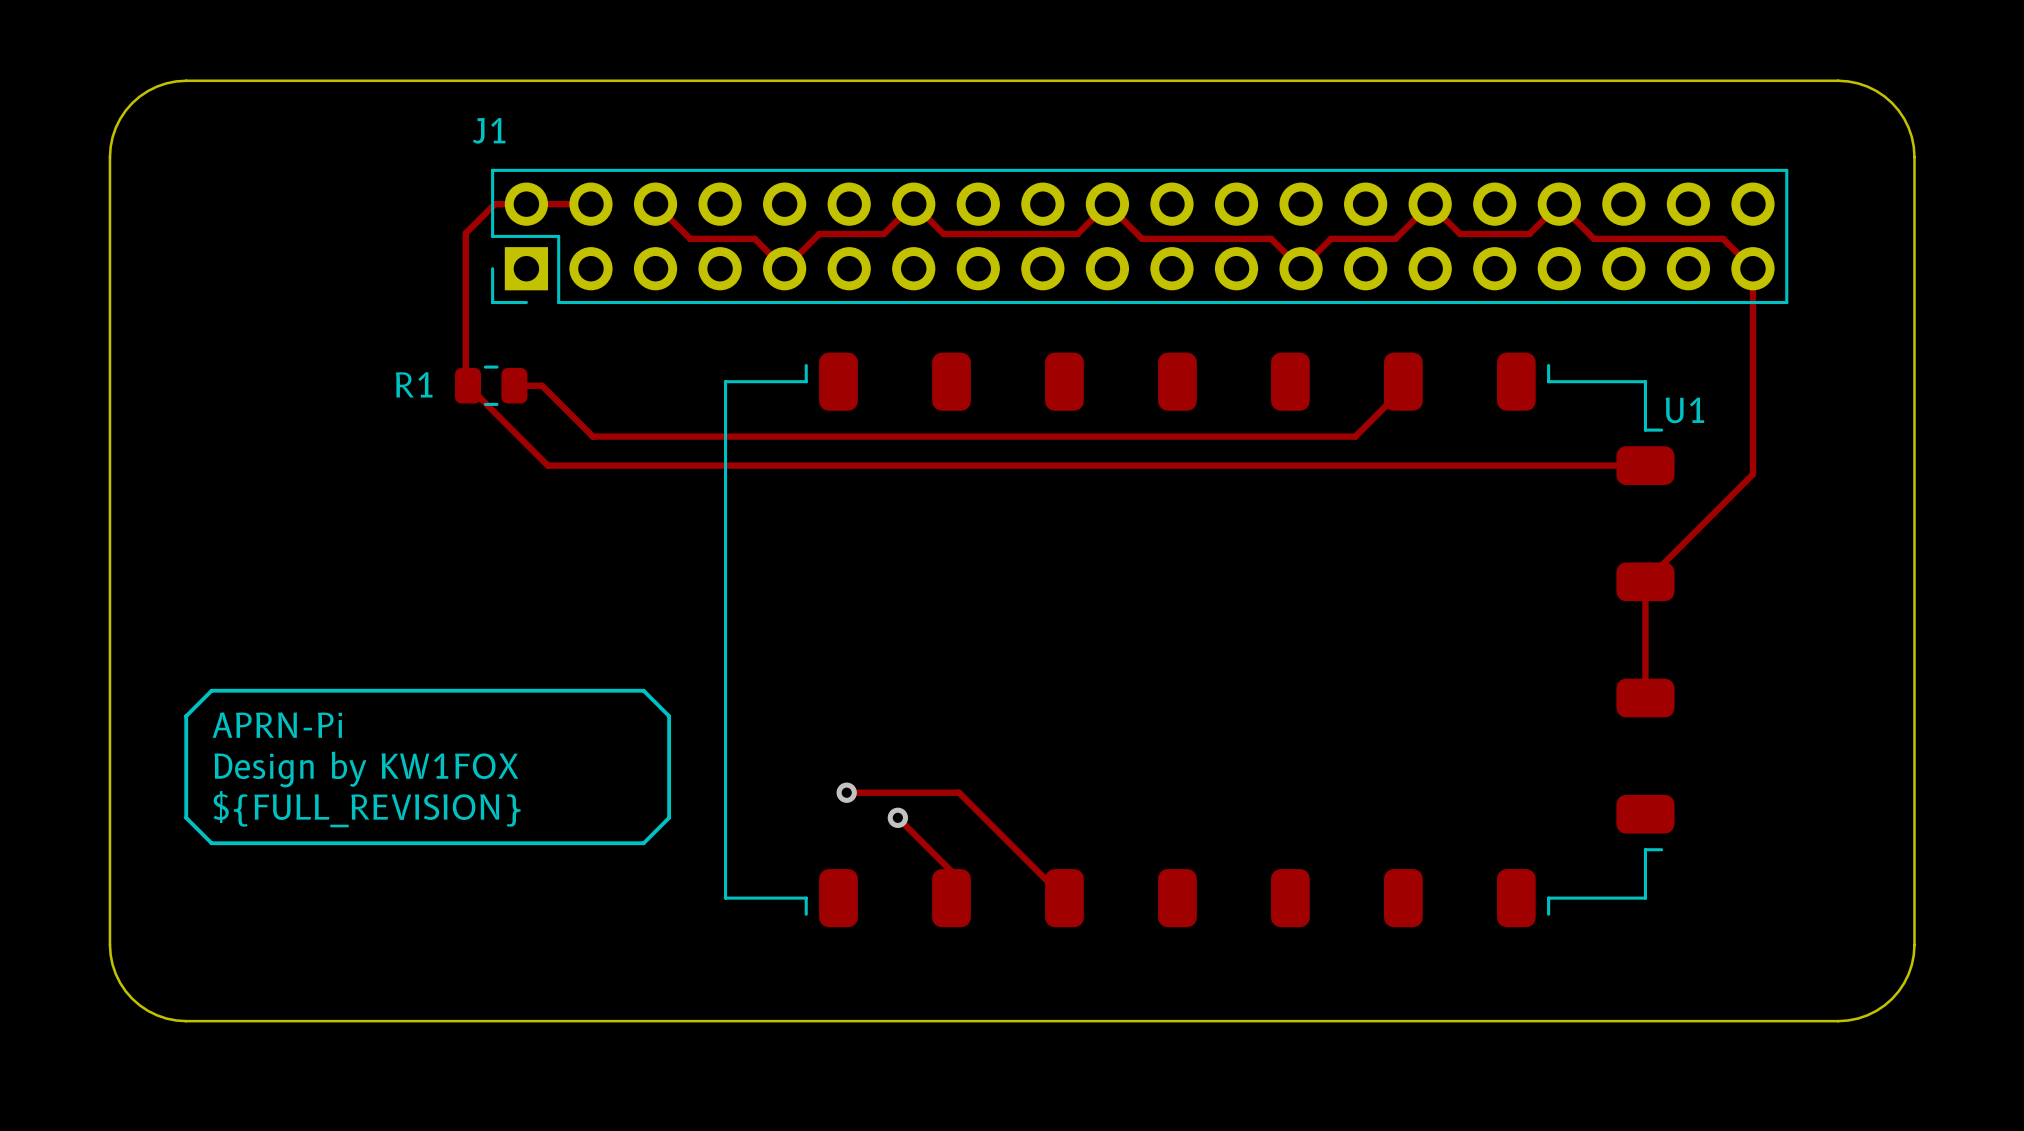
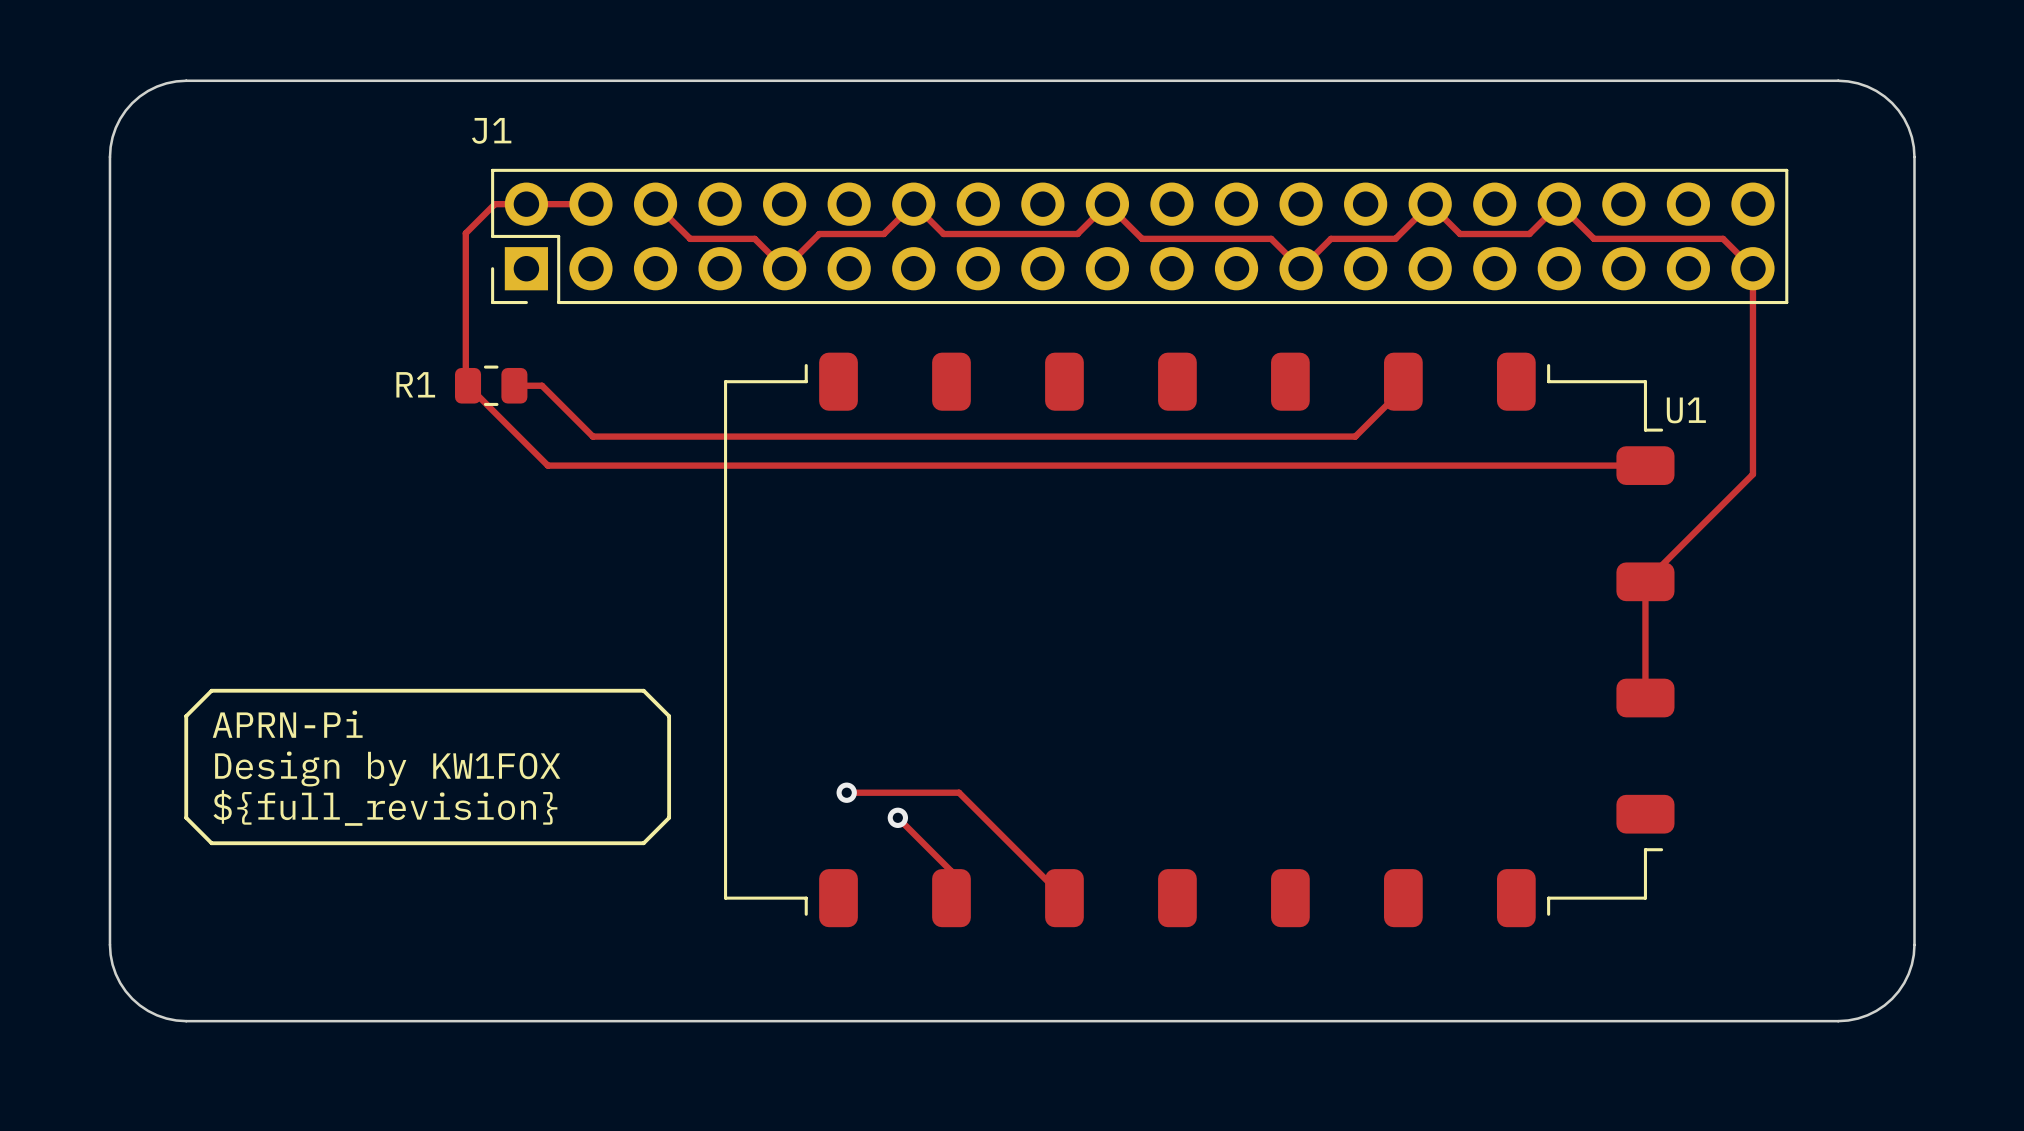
text: ${FULL_REVISION} (366, 809) -> ${full_revision} (385, 807)

